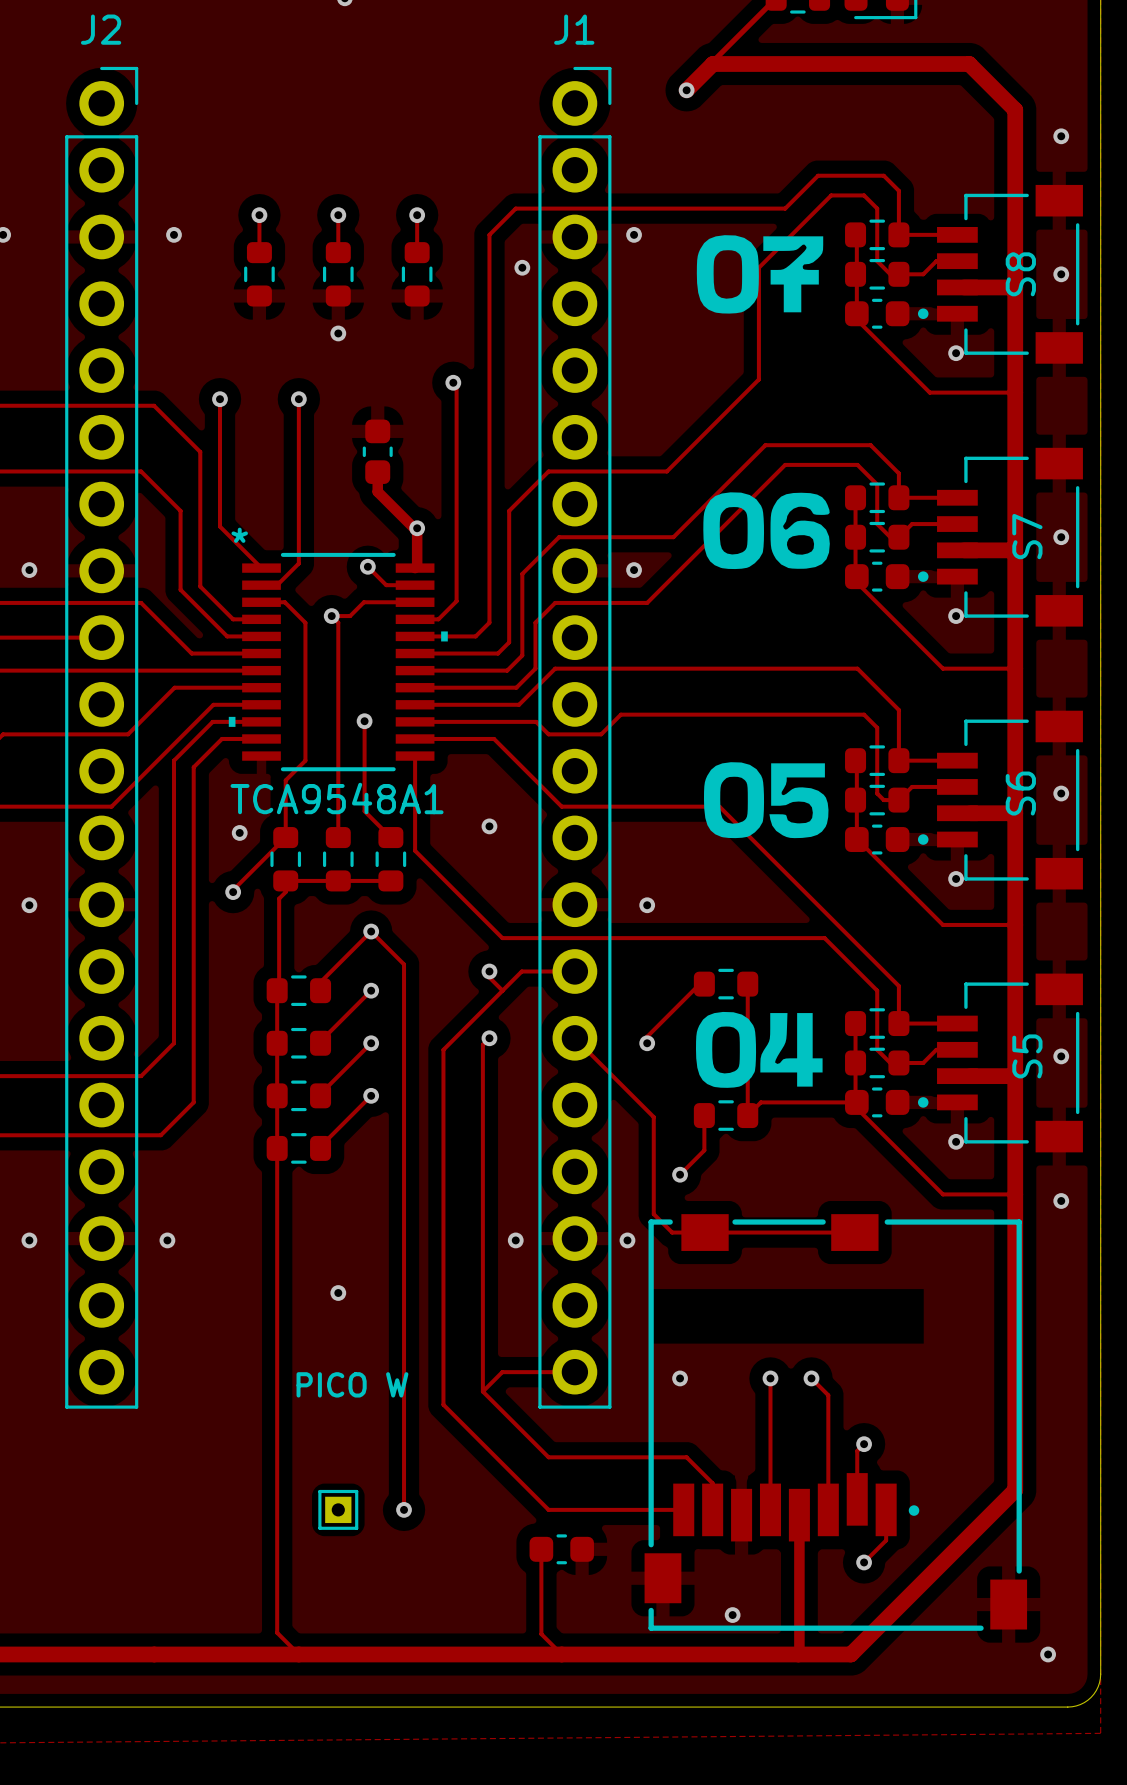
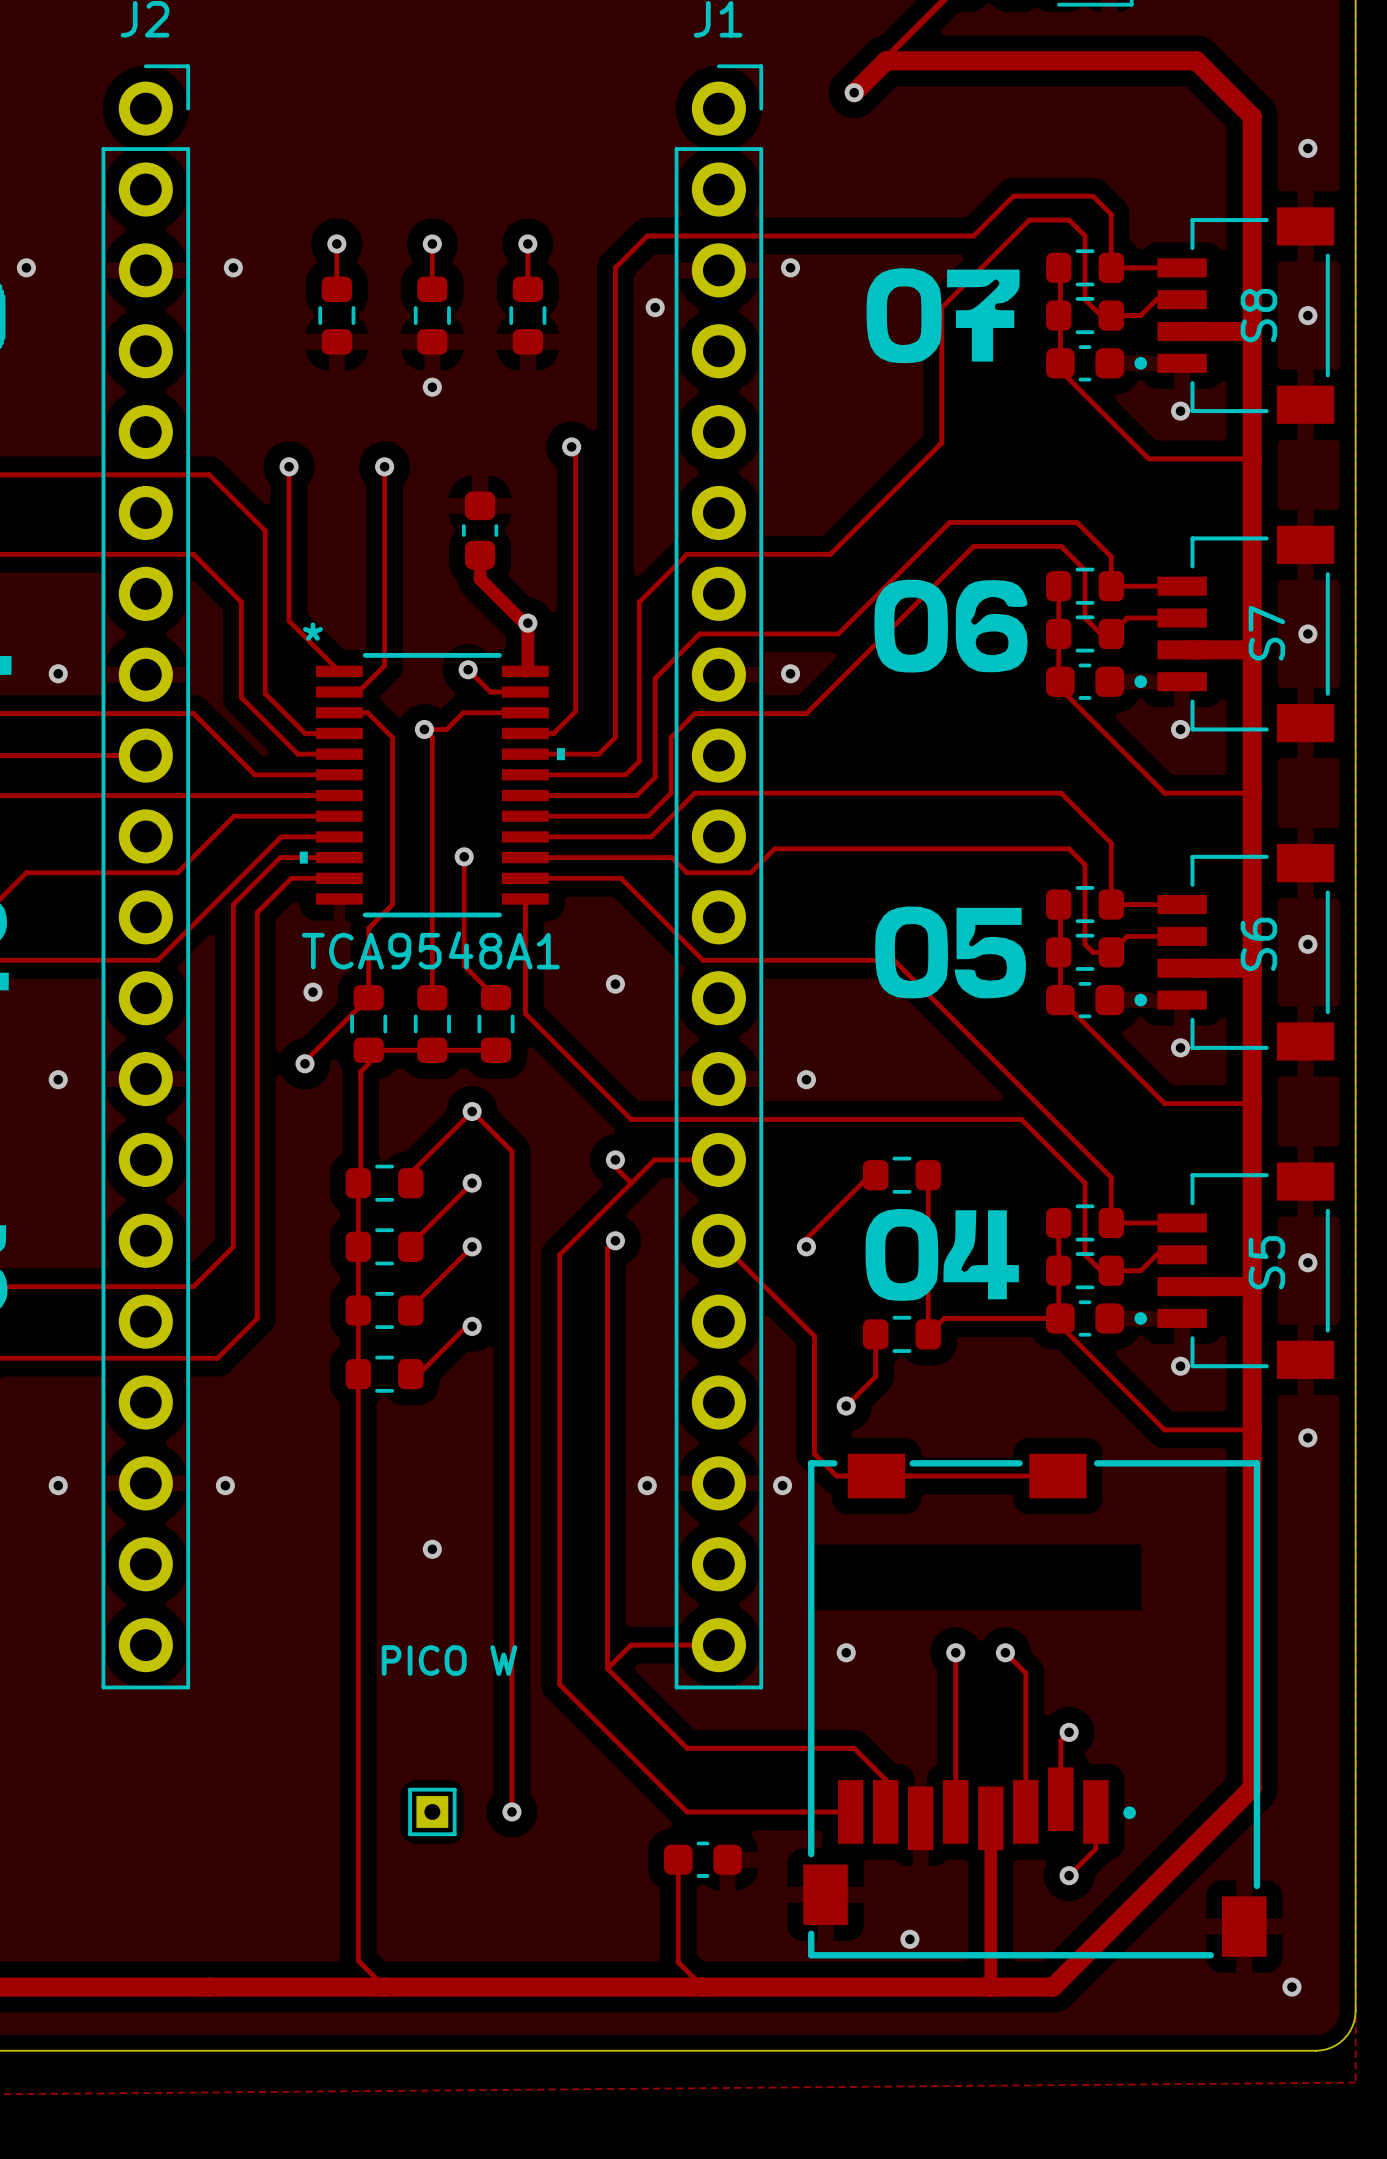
track: (371, 1095) (320, 1146) (320, 1154) -> (472, 1326) (466, 1326) (410, 1382)
via position: (371, 1095) -> (472, 1326)

